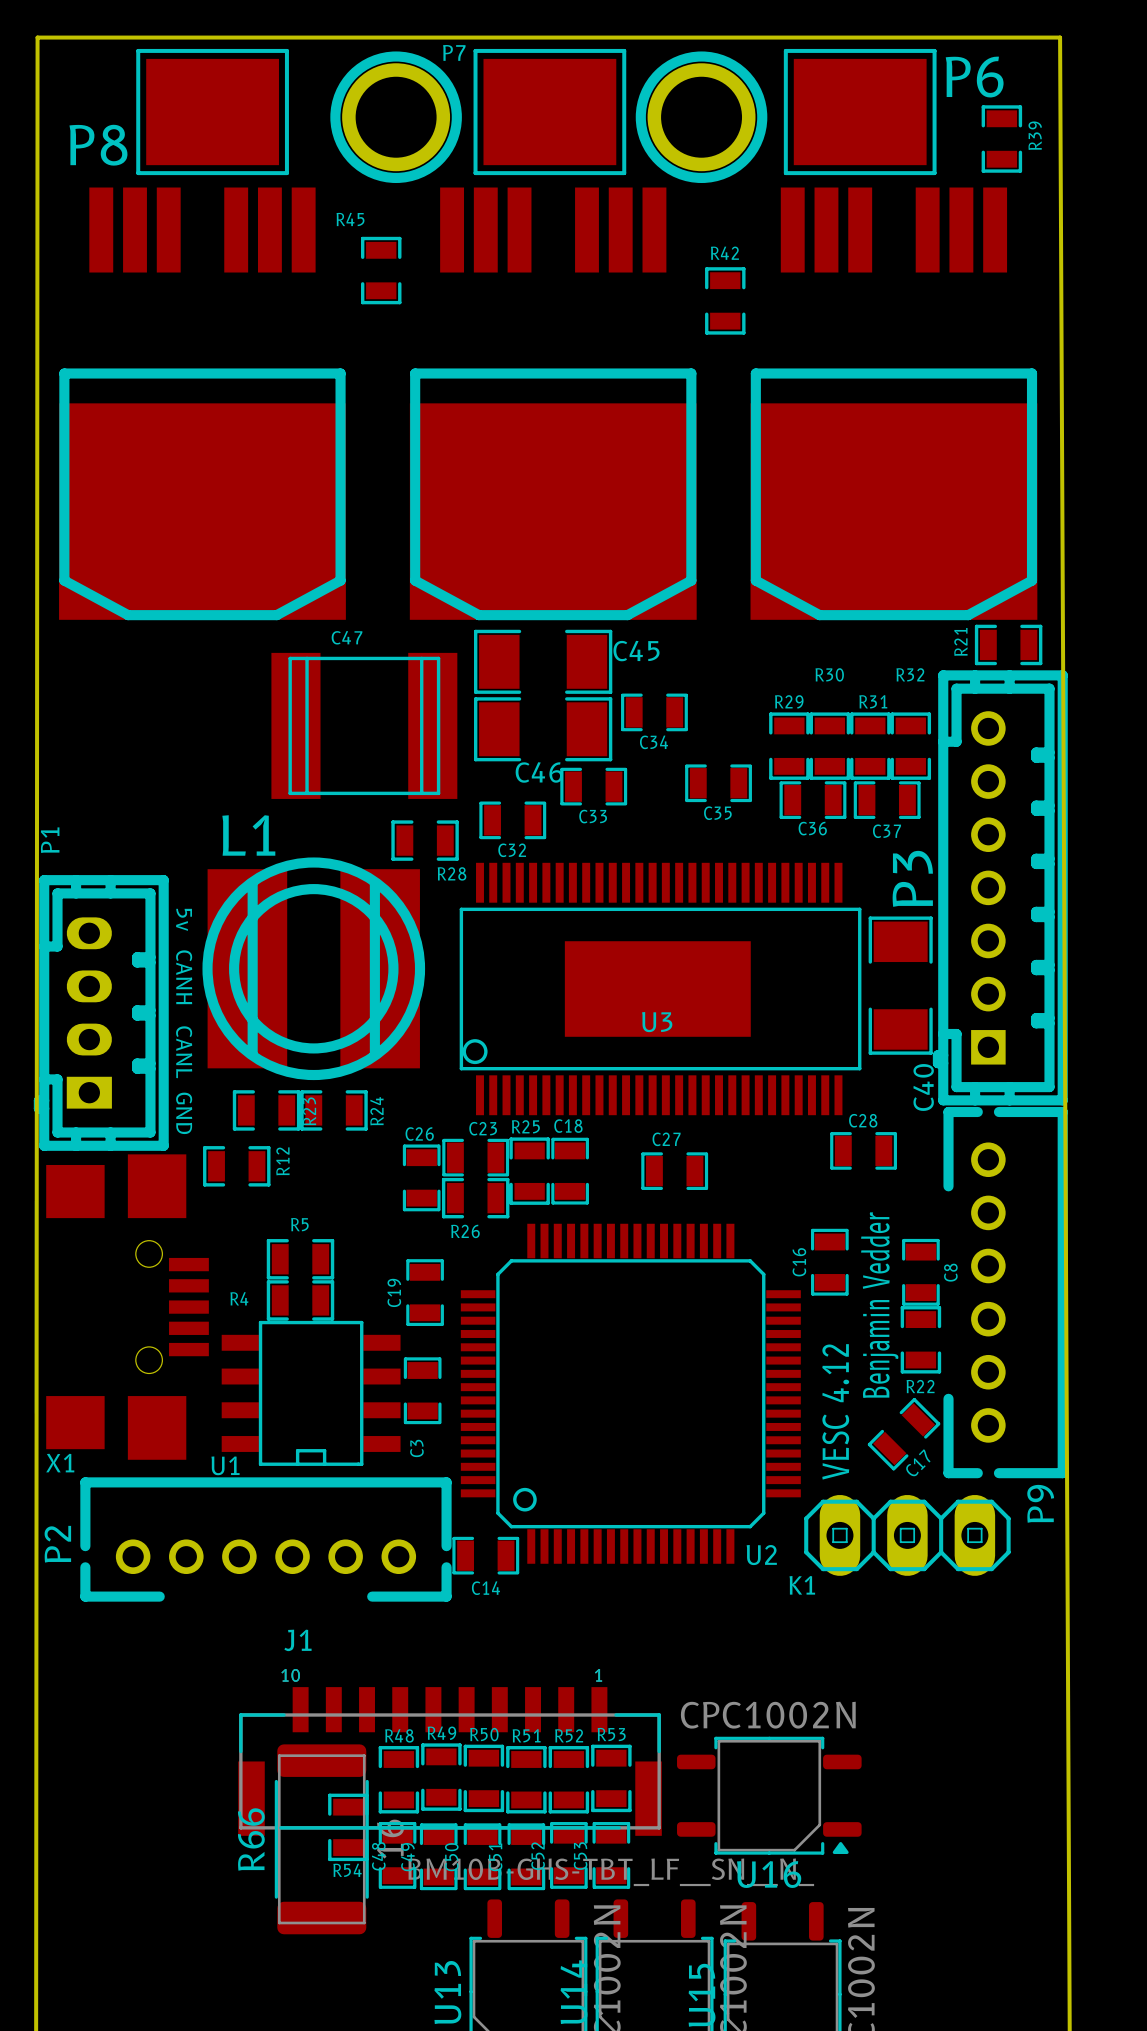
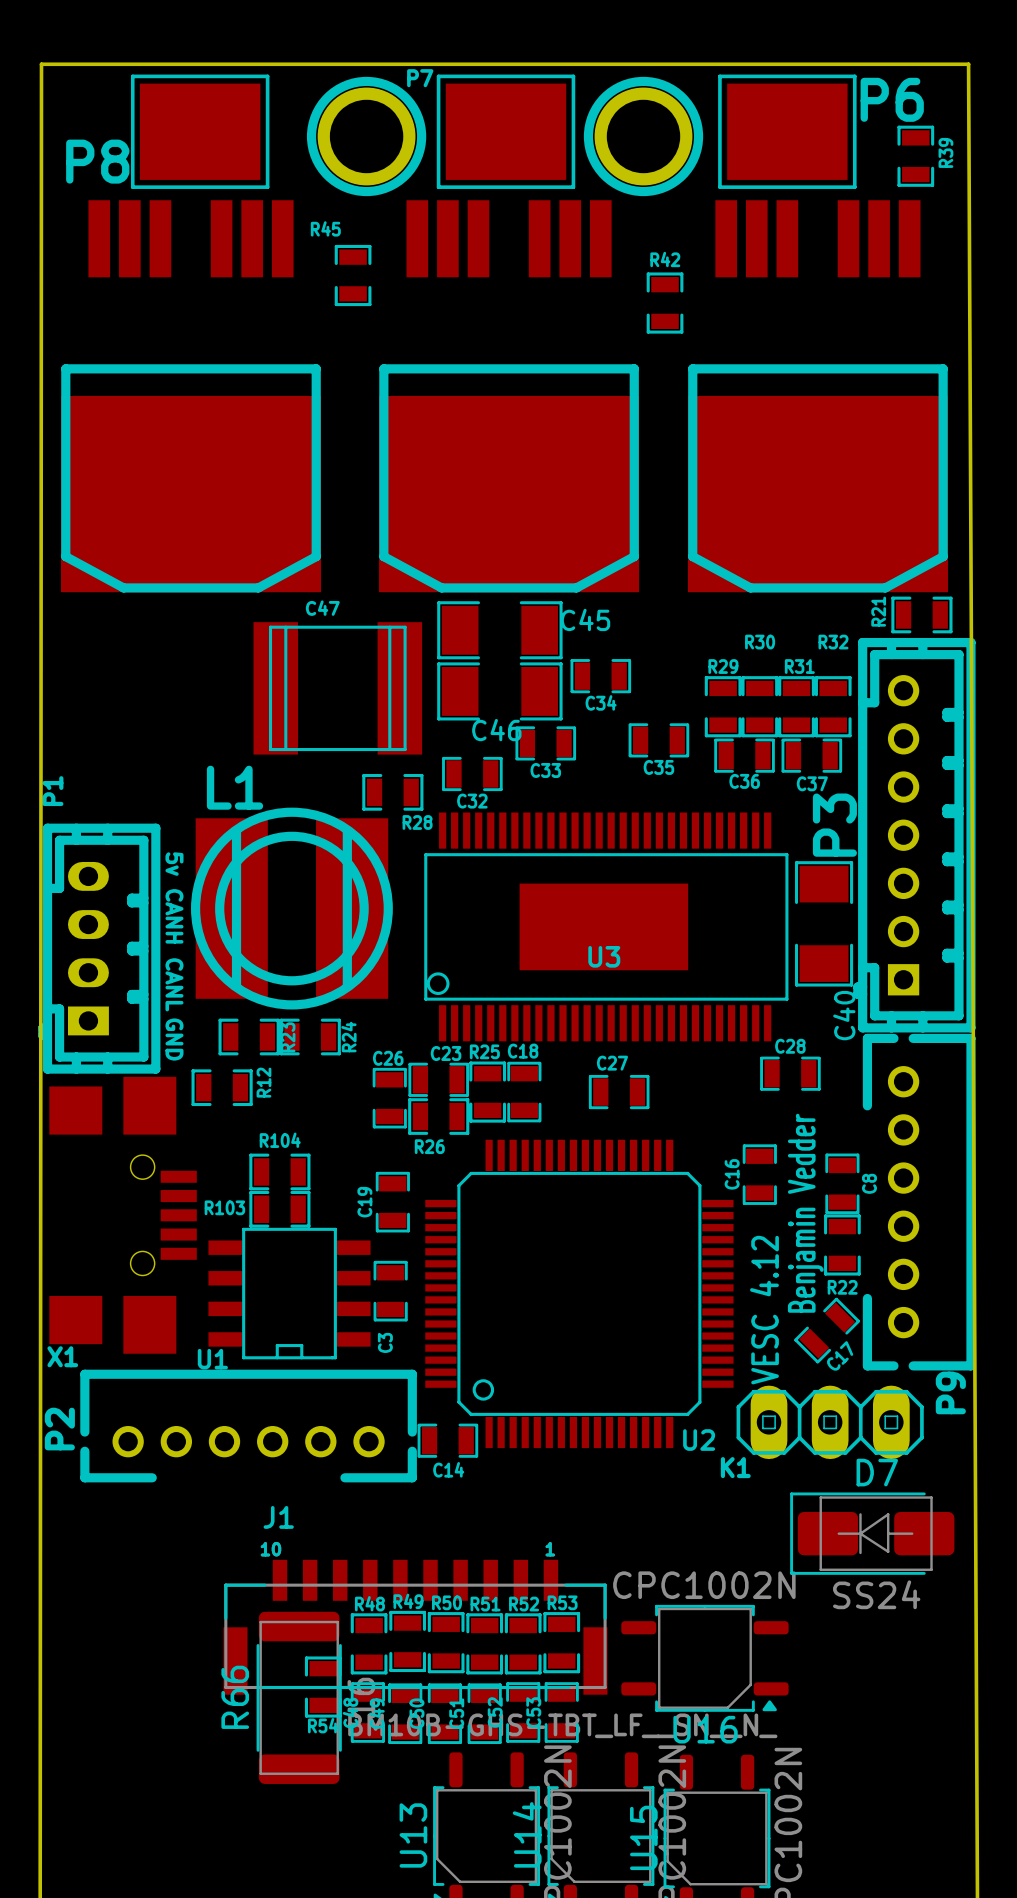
R5 name: R5 (299, 1224) -> R104 (280, 1140)
R4 name: R4 (239, 1298) -> R103 (224, 1207)
D7: none -> SS24 (872, 1533)

